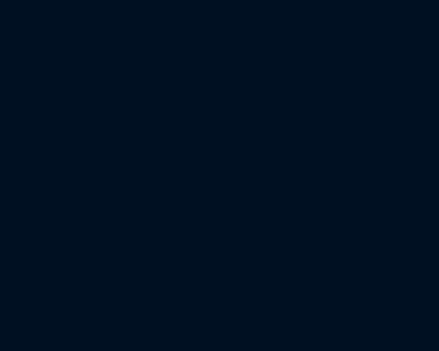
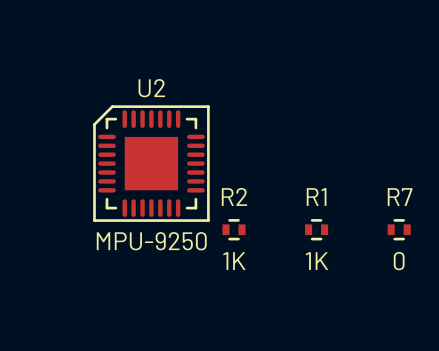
U2: none -> MPU-9250 (151, 163)
R2: none -> 1K (234, 229)
R1: none -> 1K (316, 229)
R7: none -> 0 (399, 229)

